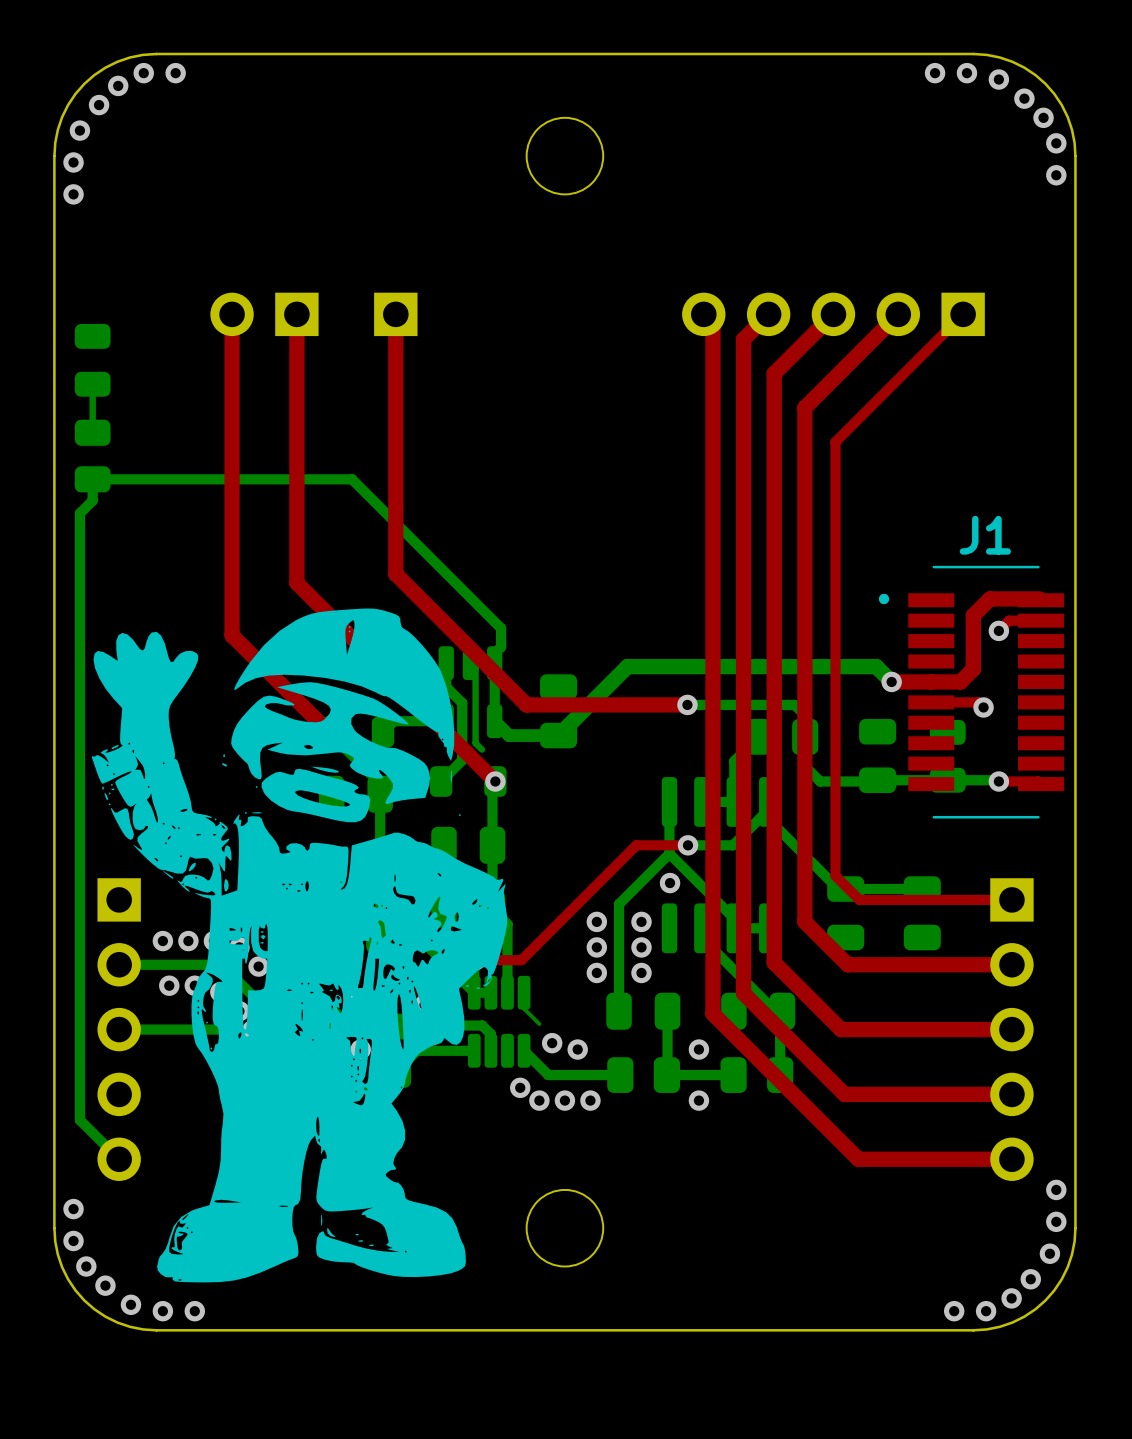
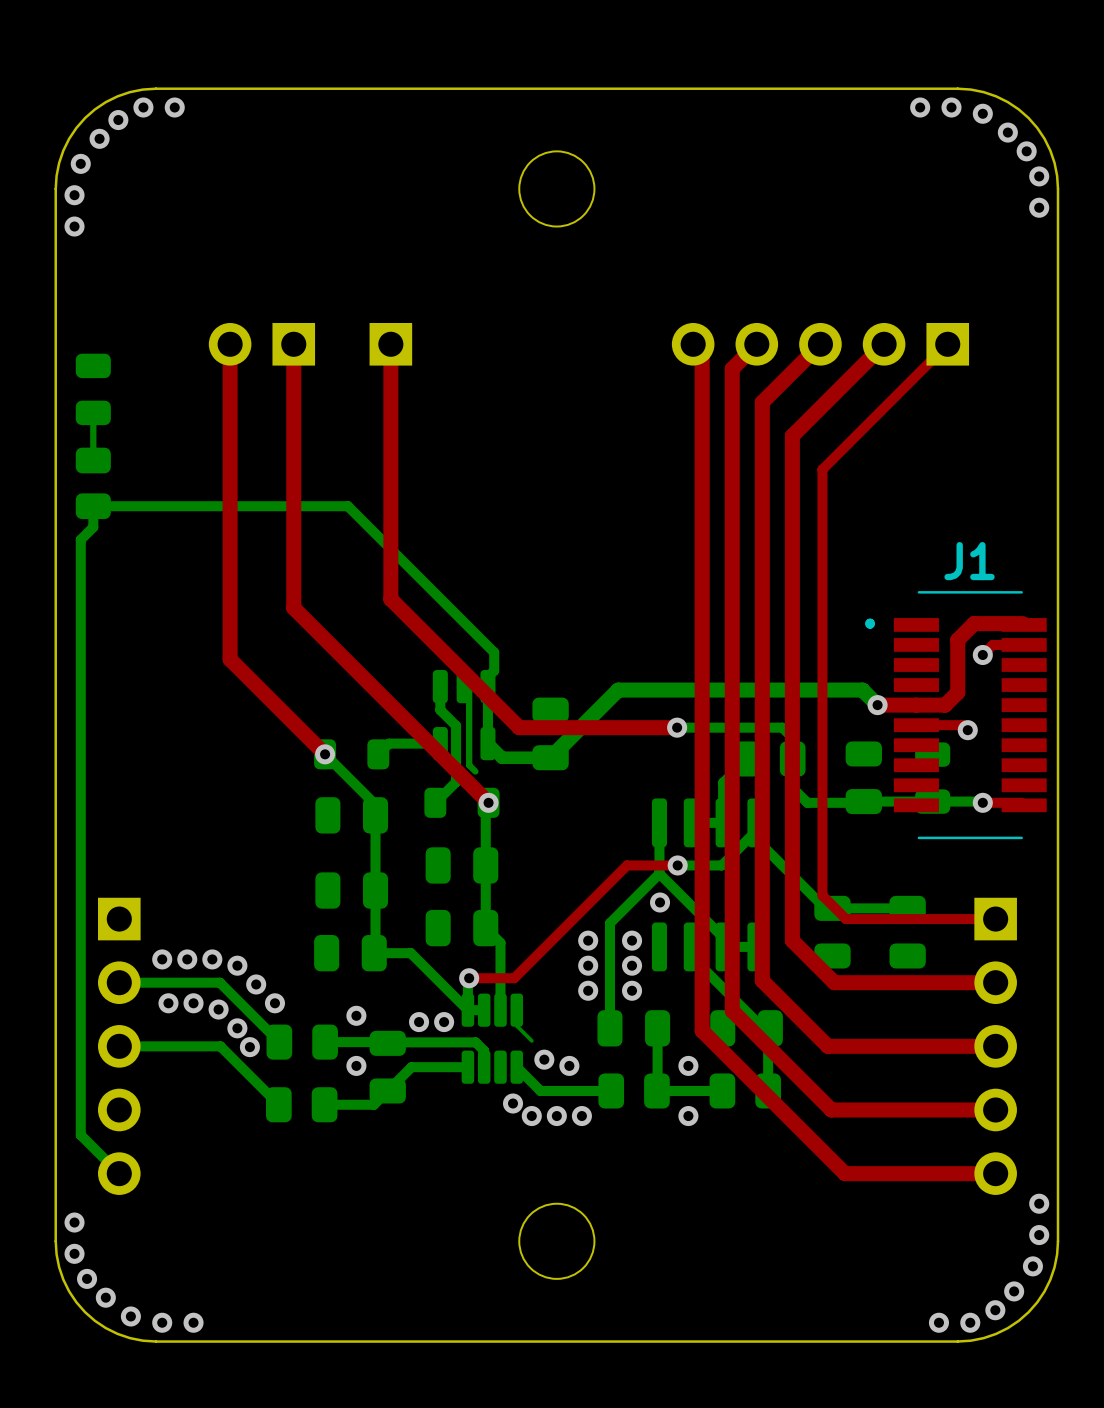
part: (299, 945) -> none

